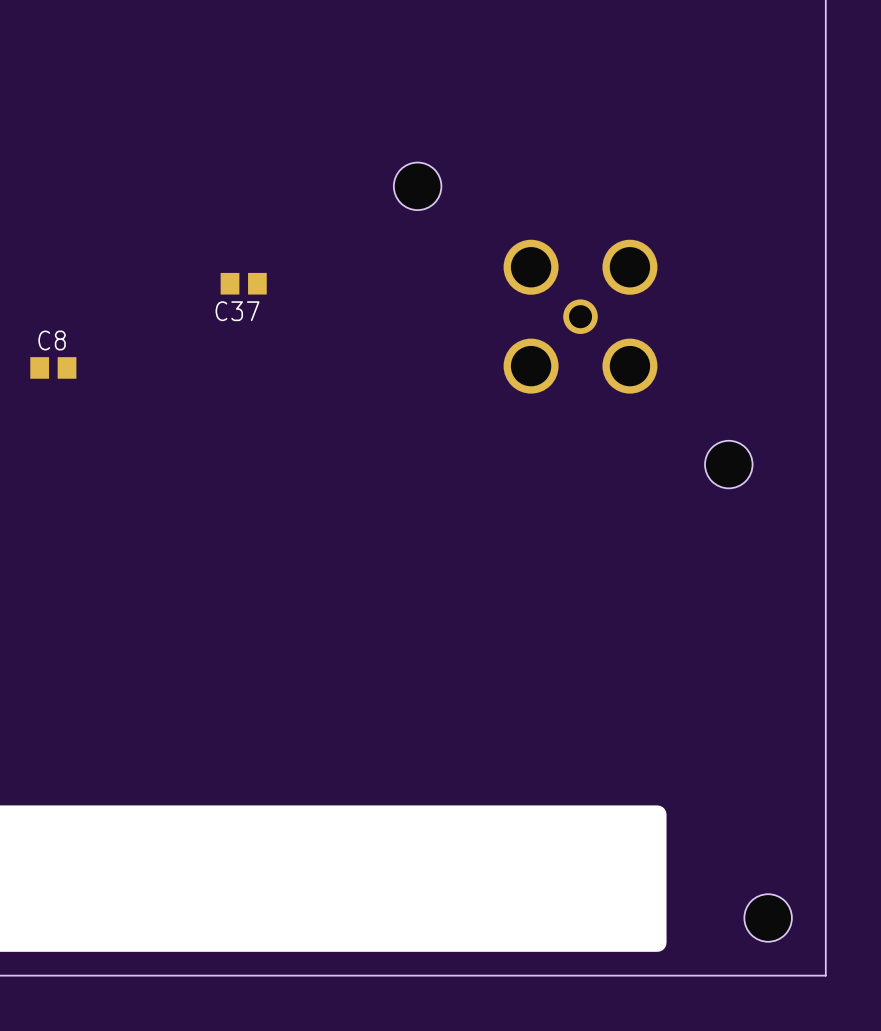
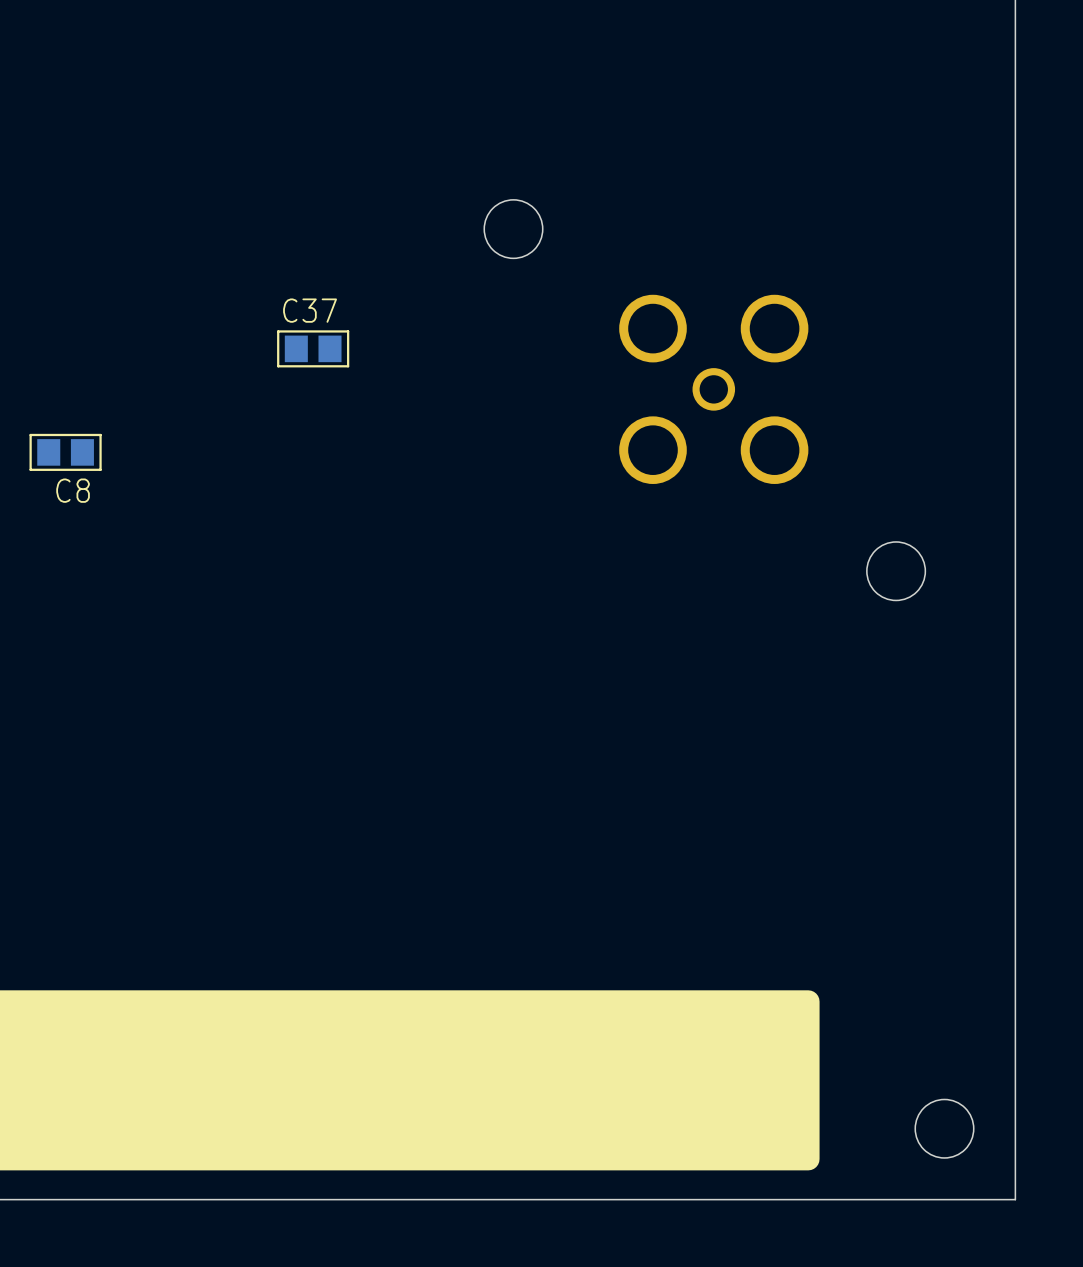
C37 footprint: [220, 272, 267, 295] -> [277, 330, 350, 368]
C37 name position: C37 (237, 311) -> C37 (310, 310)
C8 name position: C8 (52, 340) -> C8 (73, 490)
C8 footprint: [30, 357, 77, 379] -> [29, 433, 102, 471]

